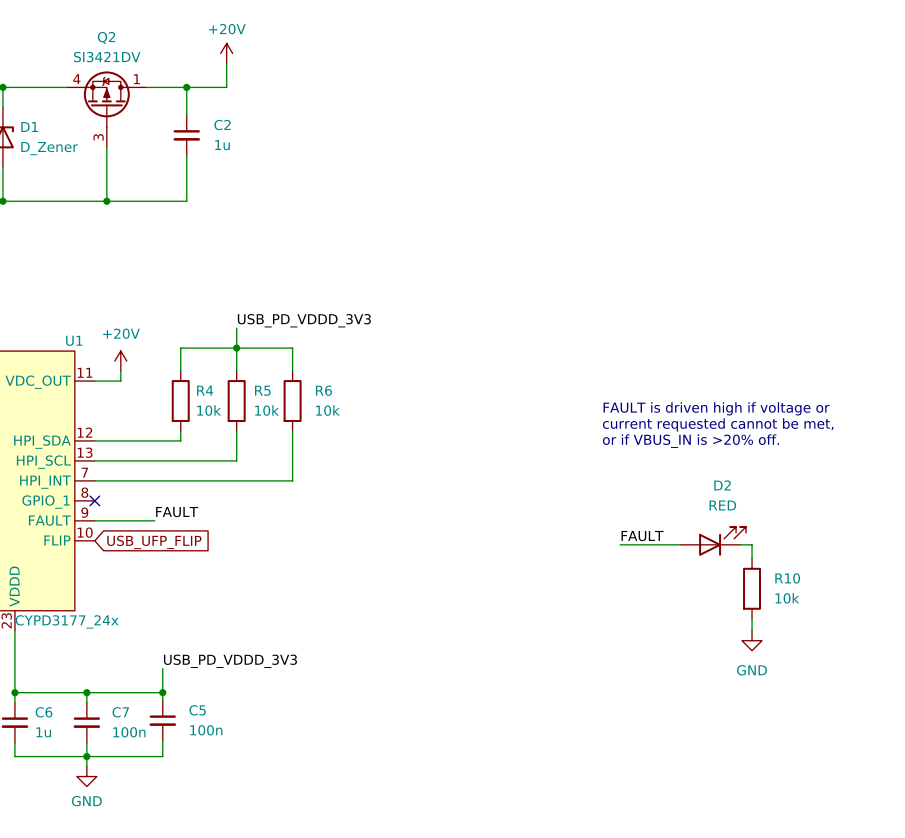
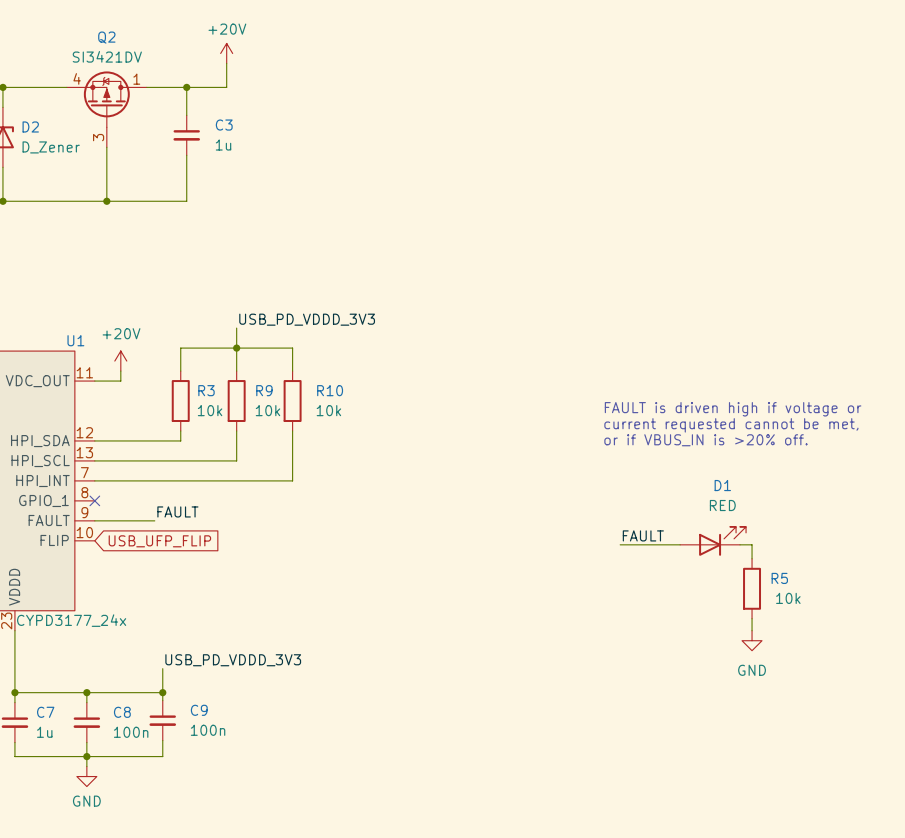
C2 name: C2 (222, 125) -> C3 (224, 125)
D1 name: D1 (29, 126) -> D2 (30, 126)
R4 name: R4 (205, 390) -> R3 (206, 390)
R5 name: R5 (262, 390) -> R9 (264, 390)
R6 name: R6 (323, 390) -> R10 (330, 390)
D2 name: D2 (722, 485) -> D1 (722, 485)
R10 name: R10 (787, 578) -> R5 (779, 578)
C5 name: C5 (197, 710) -> C9 (199, 710)
C6 name: C6 (44, 712) -> C7 (45, 712)
C7 name: C7 (120, 712) -> C8 (122, 712)

